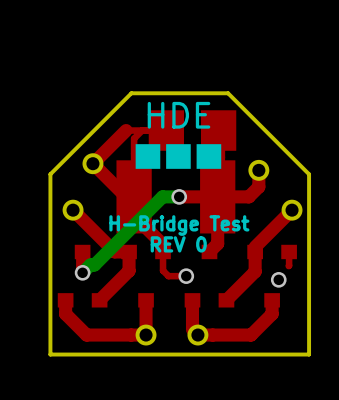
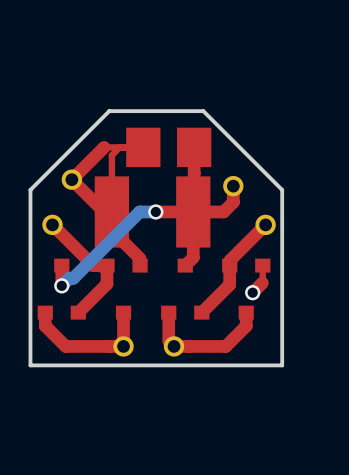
text: HDE (179, 115) -> none
text: ■■■ (178, 156) -> none
text: H-Bridge Test (179, 225) -> none
text: REV 0 (178, 244) -> none
top track: (163, 251) (163, 270) (168, 276) (186, 276) -> none
top track: none -> (262, 279) (262, 283) (252, 292)
via: (186, 276) -> none

